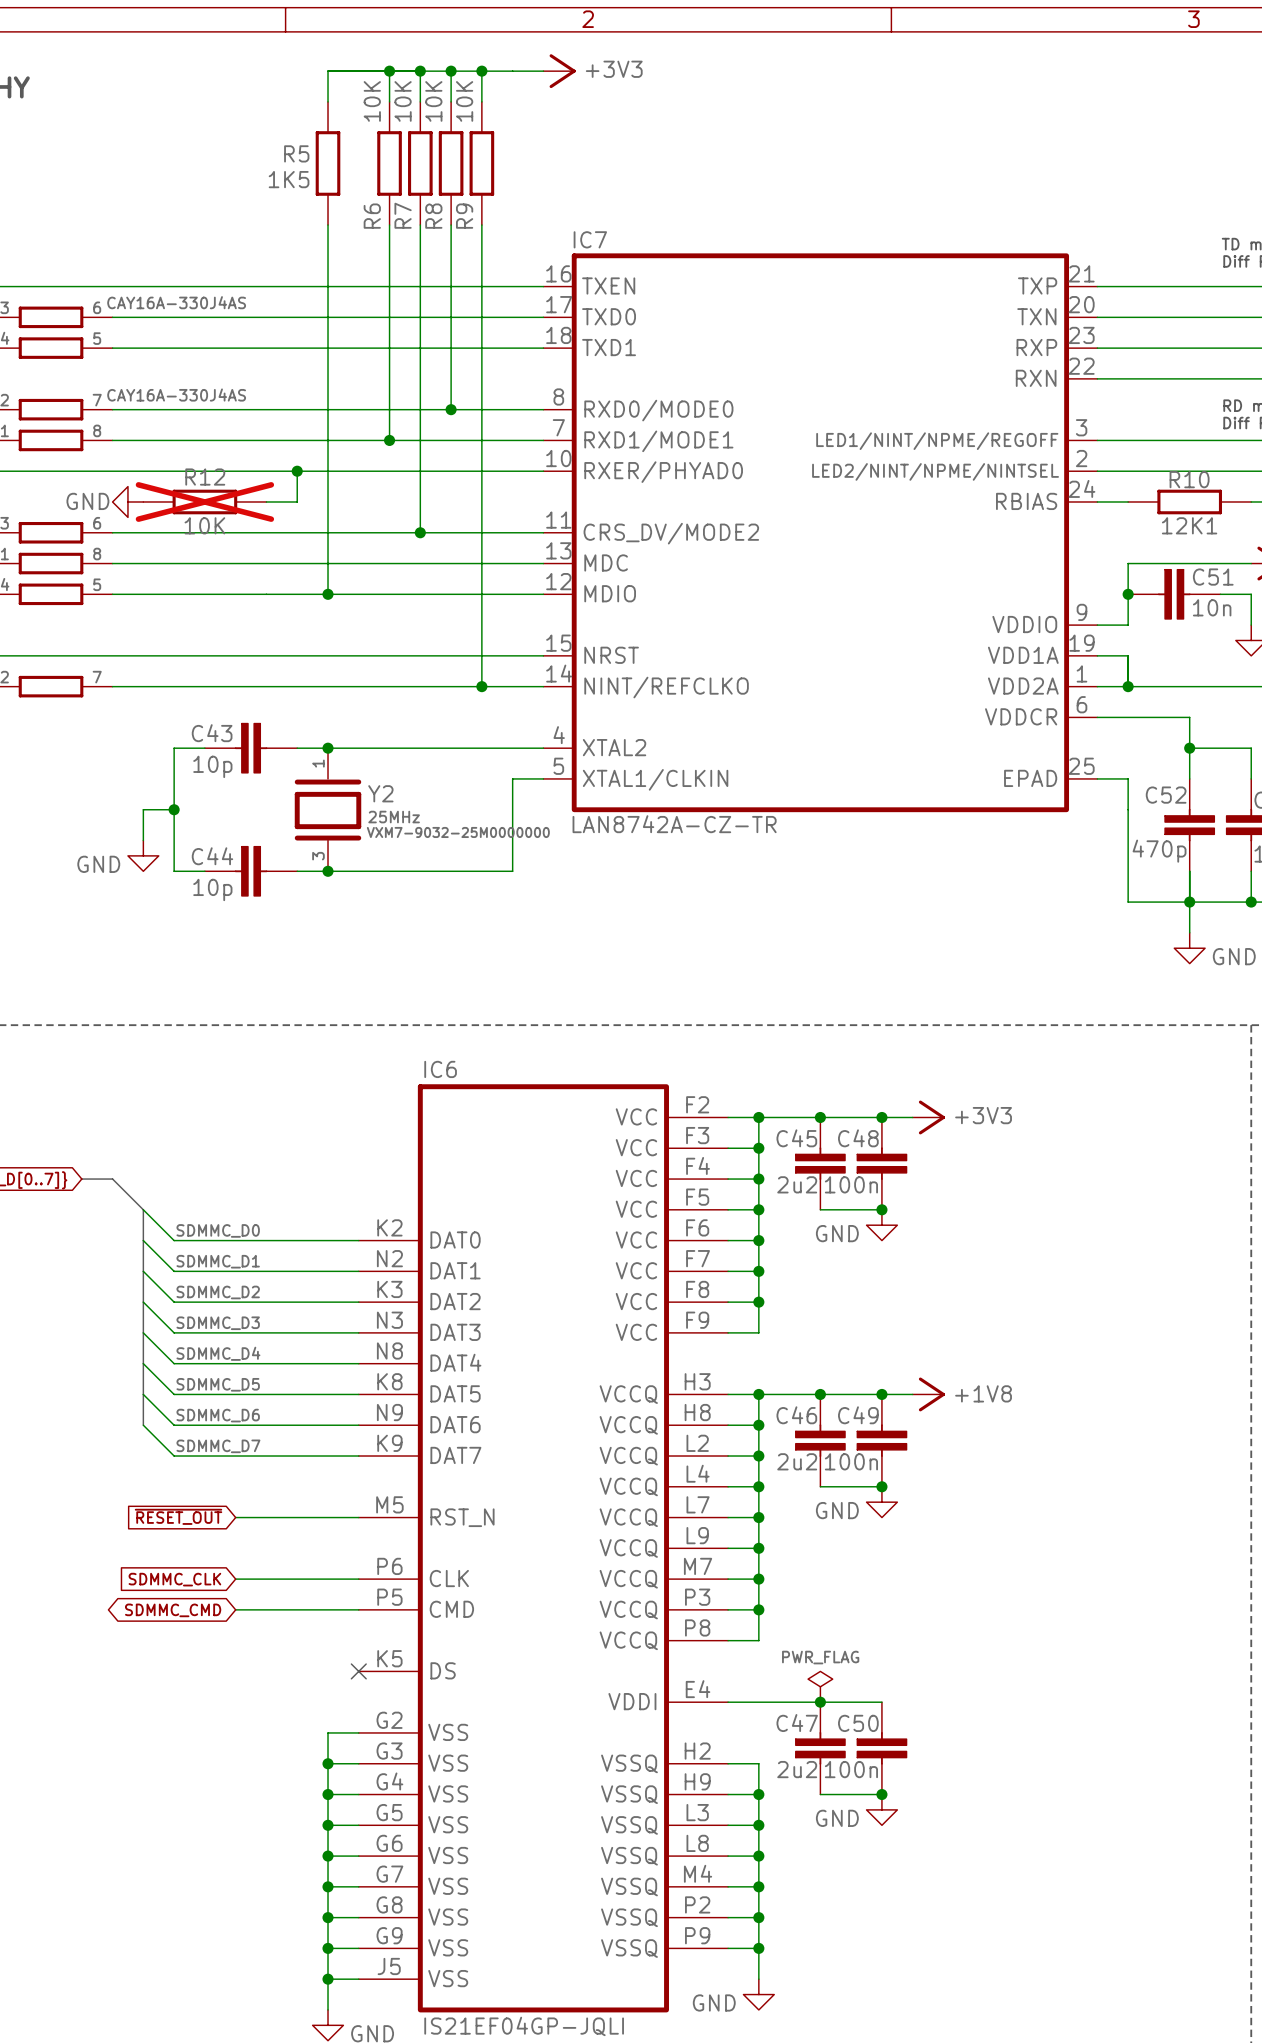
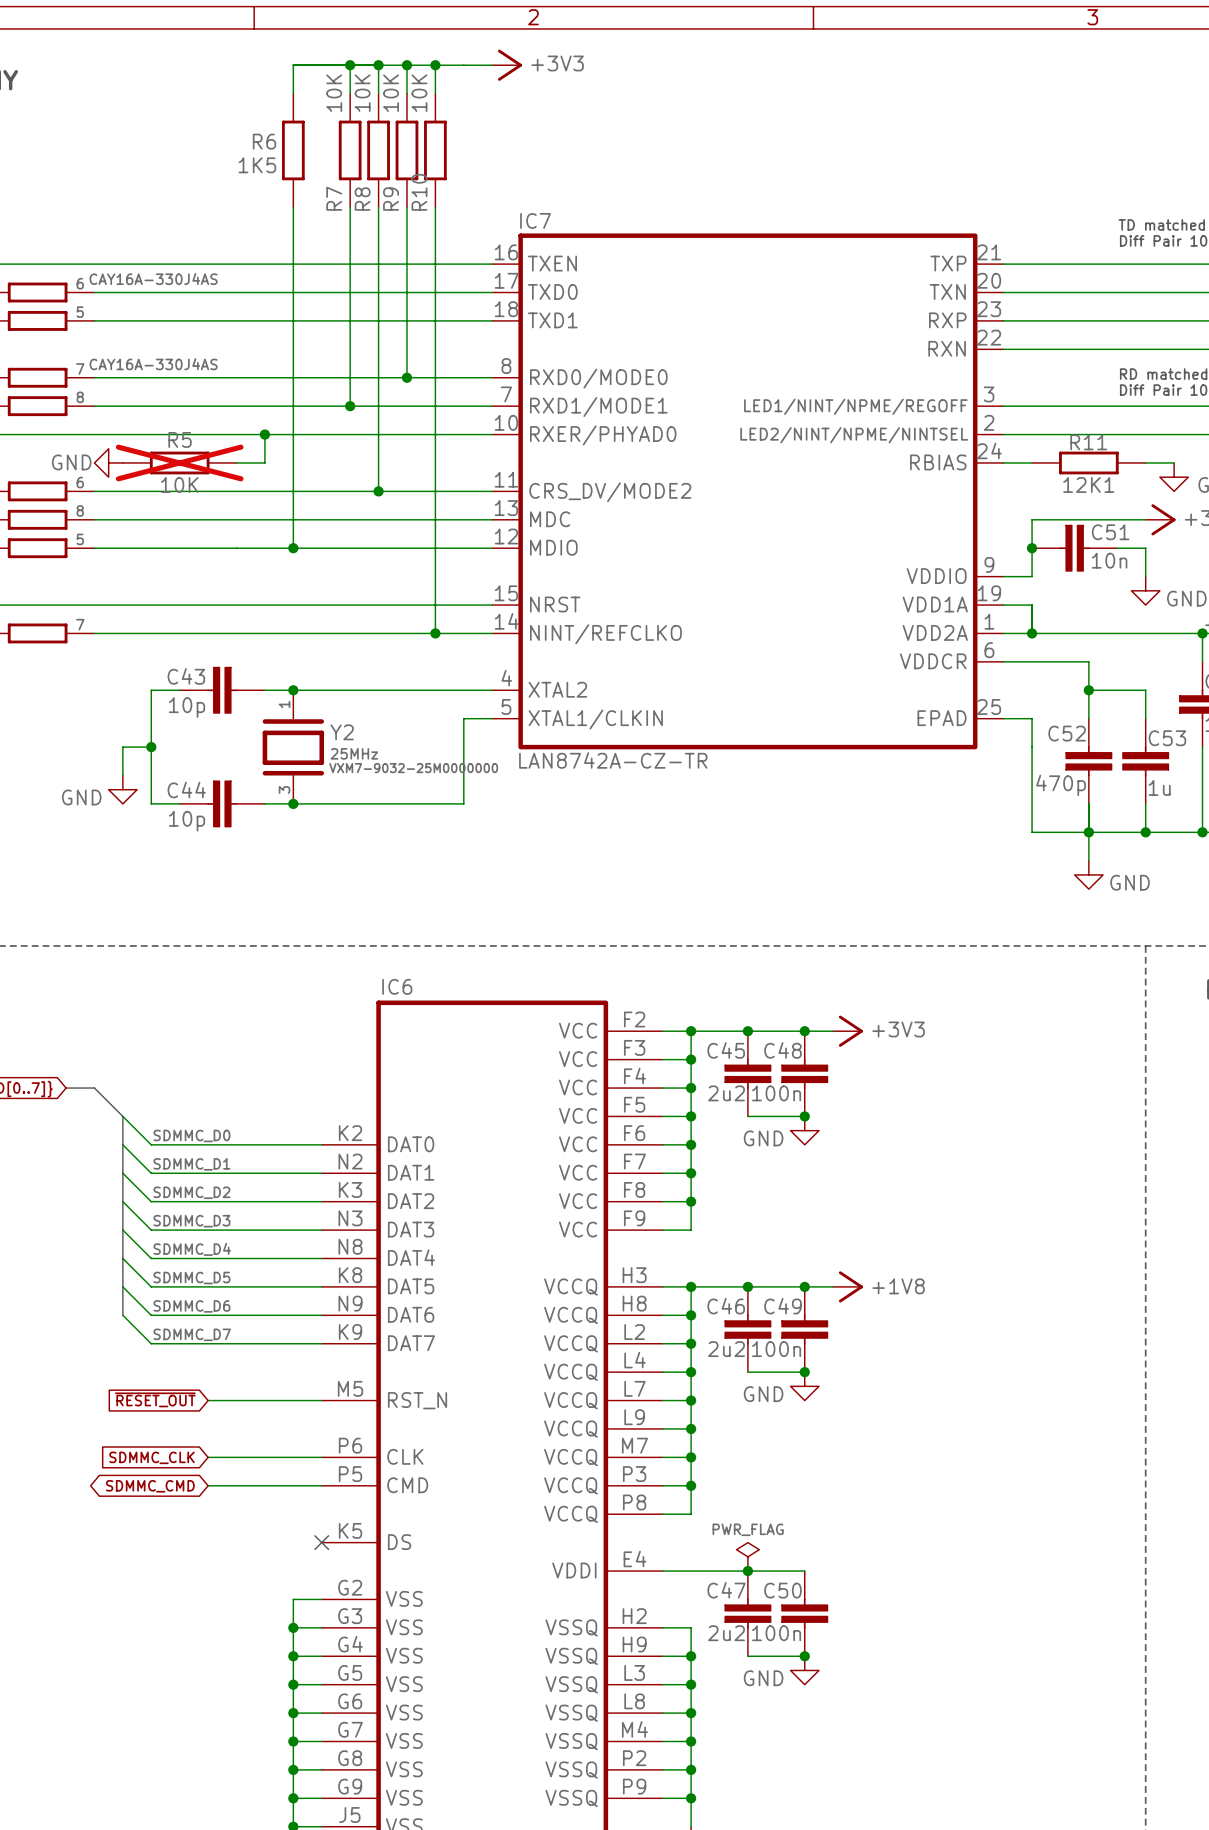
R5 name: R5 (296, 153) -> R6 (264, 141)
R7 name: R7 (403, 215) -> R8 (362, 199)
R6 name: R6 (372, 216) -> R7 (334, 198)
R8 name: R8 (433, 216) -> R9 (391, 199)
R9 name: R9 (464, 216) -> R10 (419, 192)
R12 name: R12 (205, 477) -> R5 (180, 439)
R10 name: R10 (1189, 479) -> R11 (1088, 442)

